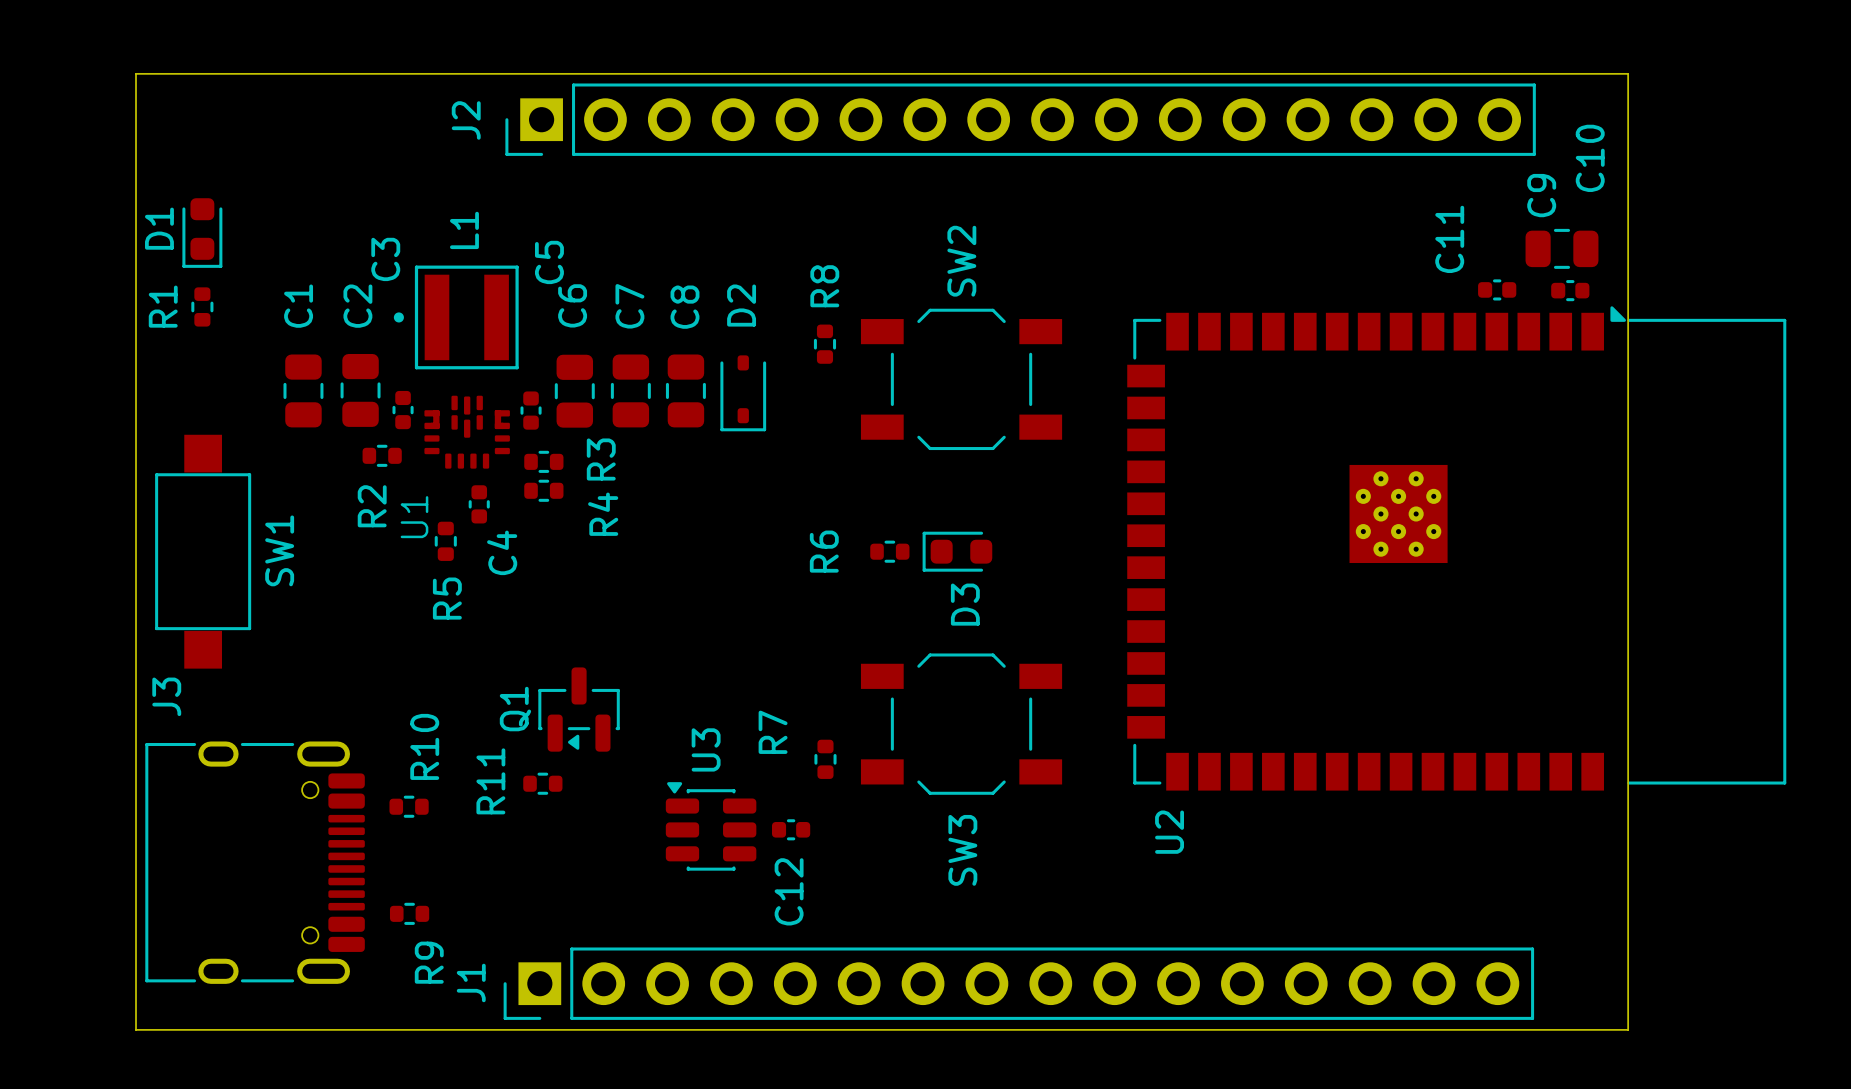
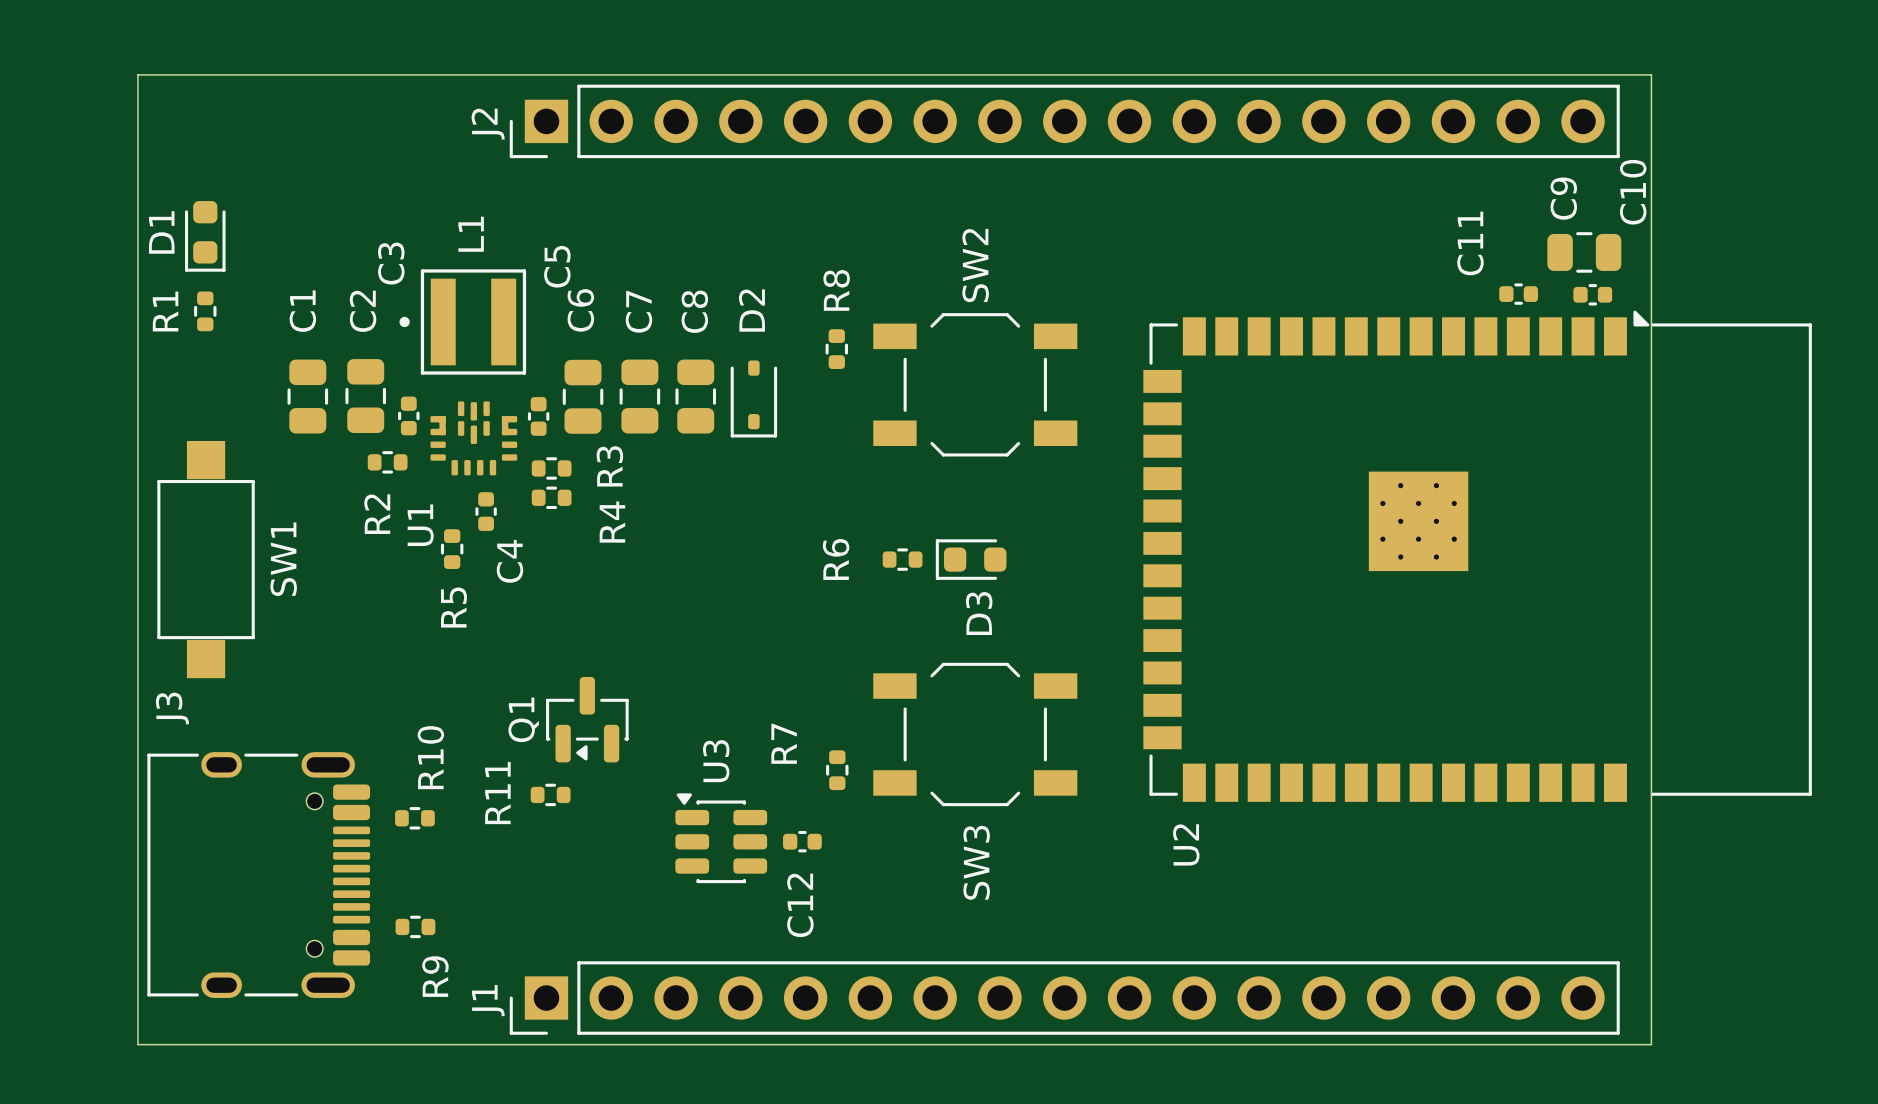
J2 footprint: [505, 83, 1536, 156] -> [509, 84, 1620, 159]
C10 name position: C10 (1590, 158) -> C10 (1633, 192)
J1 footprint: [503, 947, 1535, 1020] -> [509, 961, 1620, 1035]

